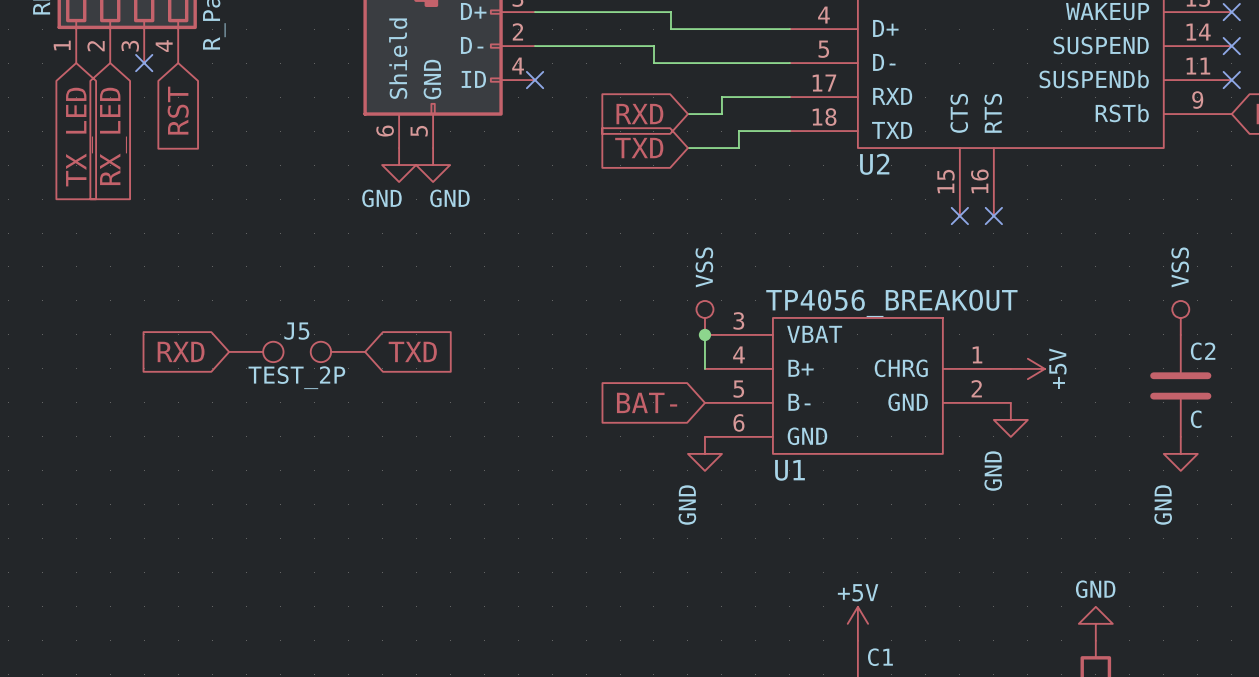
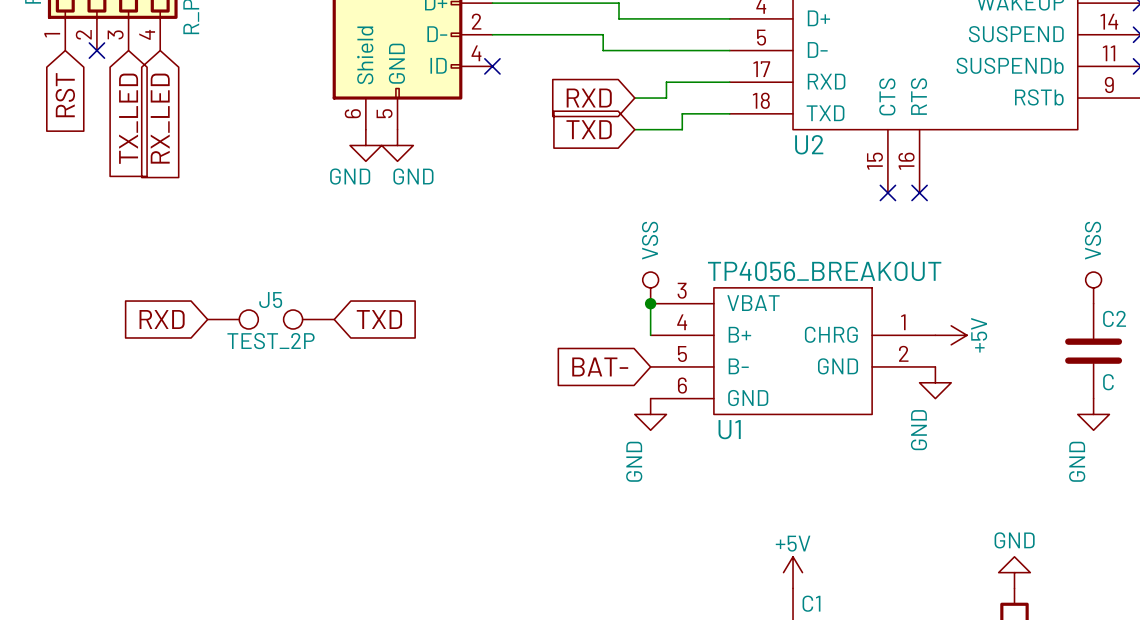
no-connect mark position: (144, 63) -> (96, 50)
global label: RST (178, 110) -> RX_LED (160, 118)
global label: RX_LED (113, 136) -> TX_LED (128, 118)
global label: TX_LED (79, 137) -> RST (65, 95)

